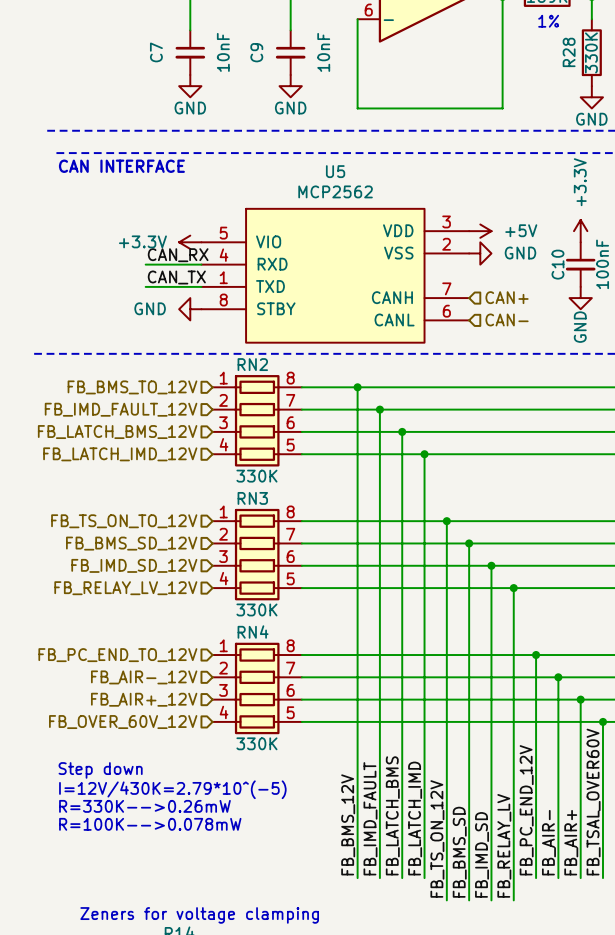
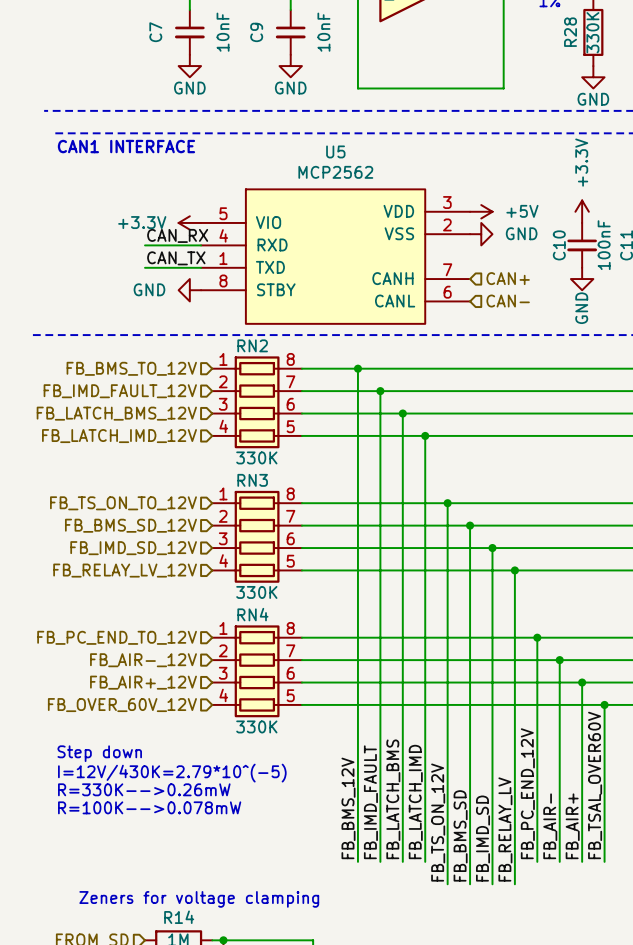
text: CAN INTERFACE (121, 166) -> CAN1 INTERFACE (126, 146)

